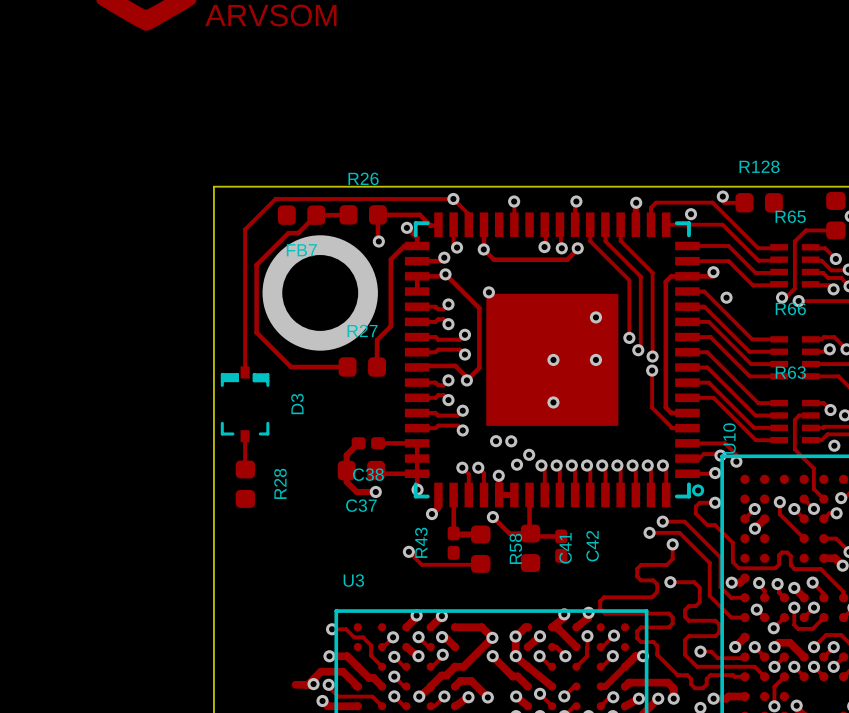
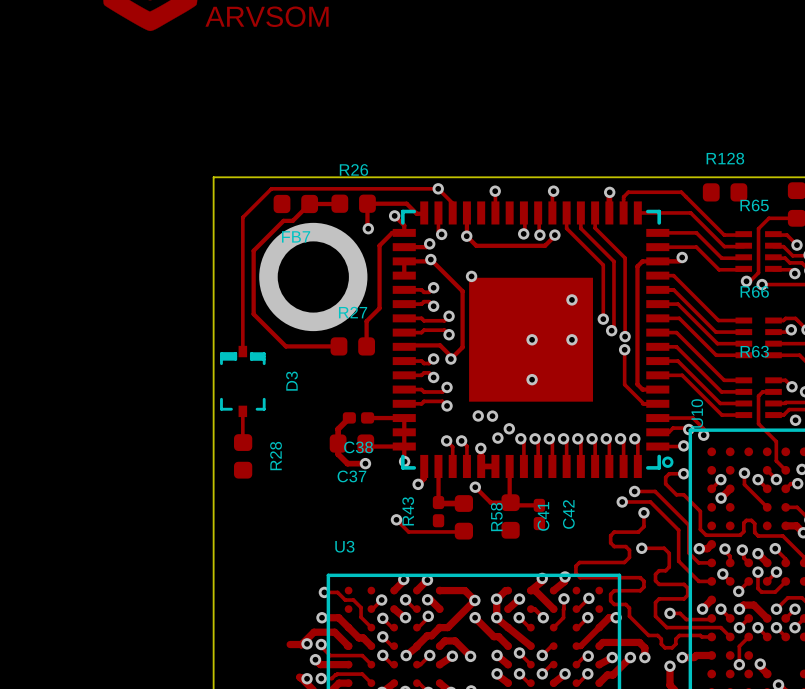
track: (722, 196) (724, 202) (744, 202) -> none
via: (722, 196) -> none
via: (691, 214) -> none
via: (726, 297) -> none

